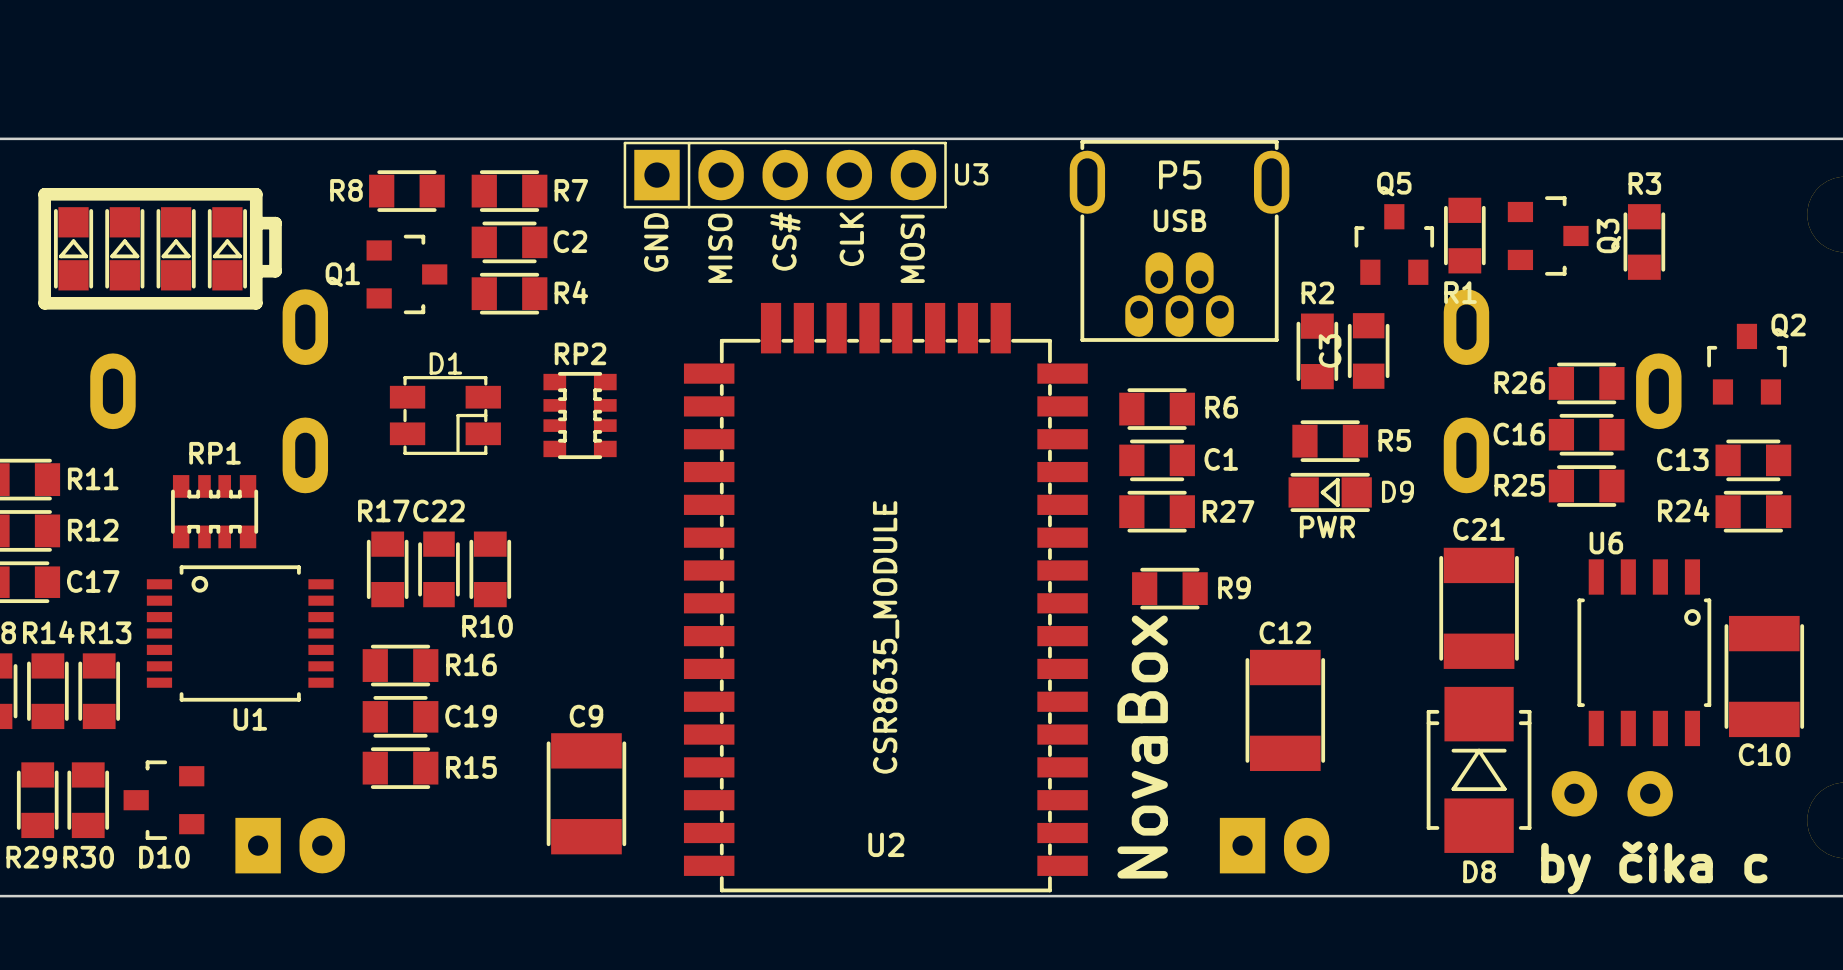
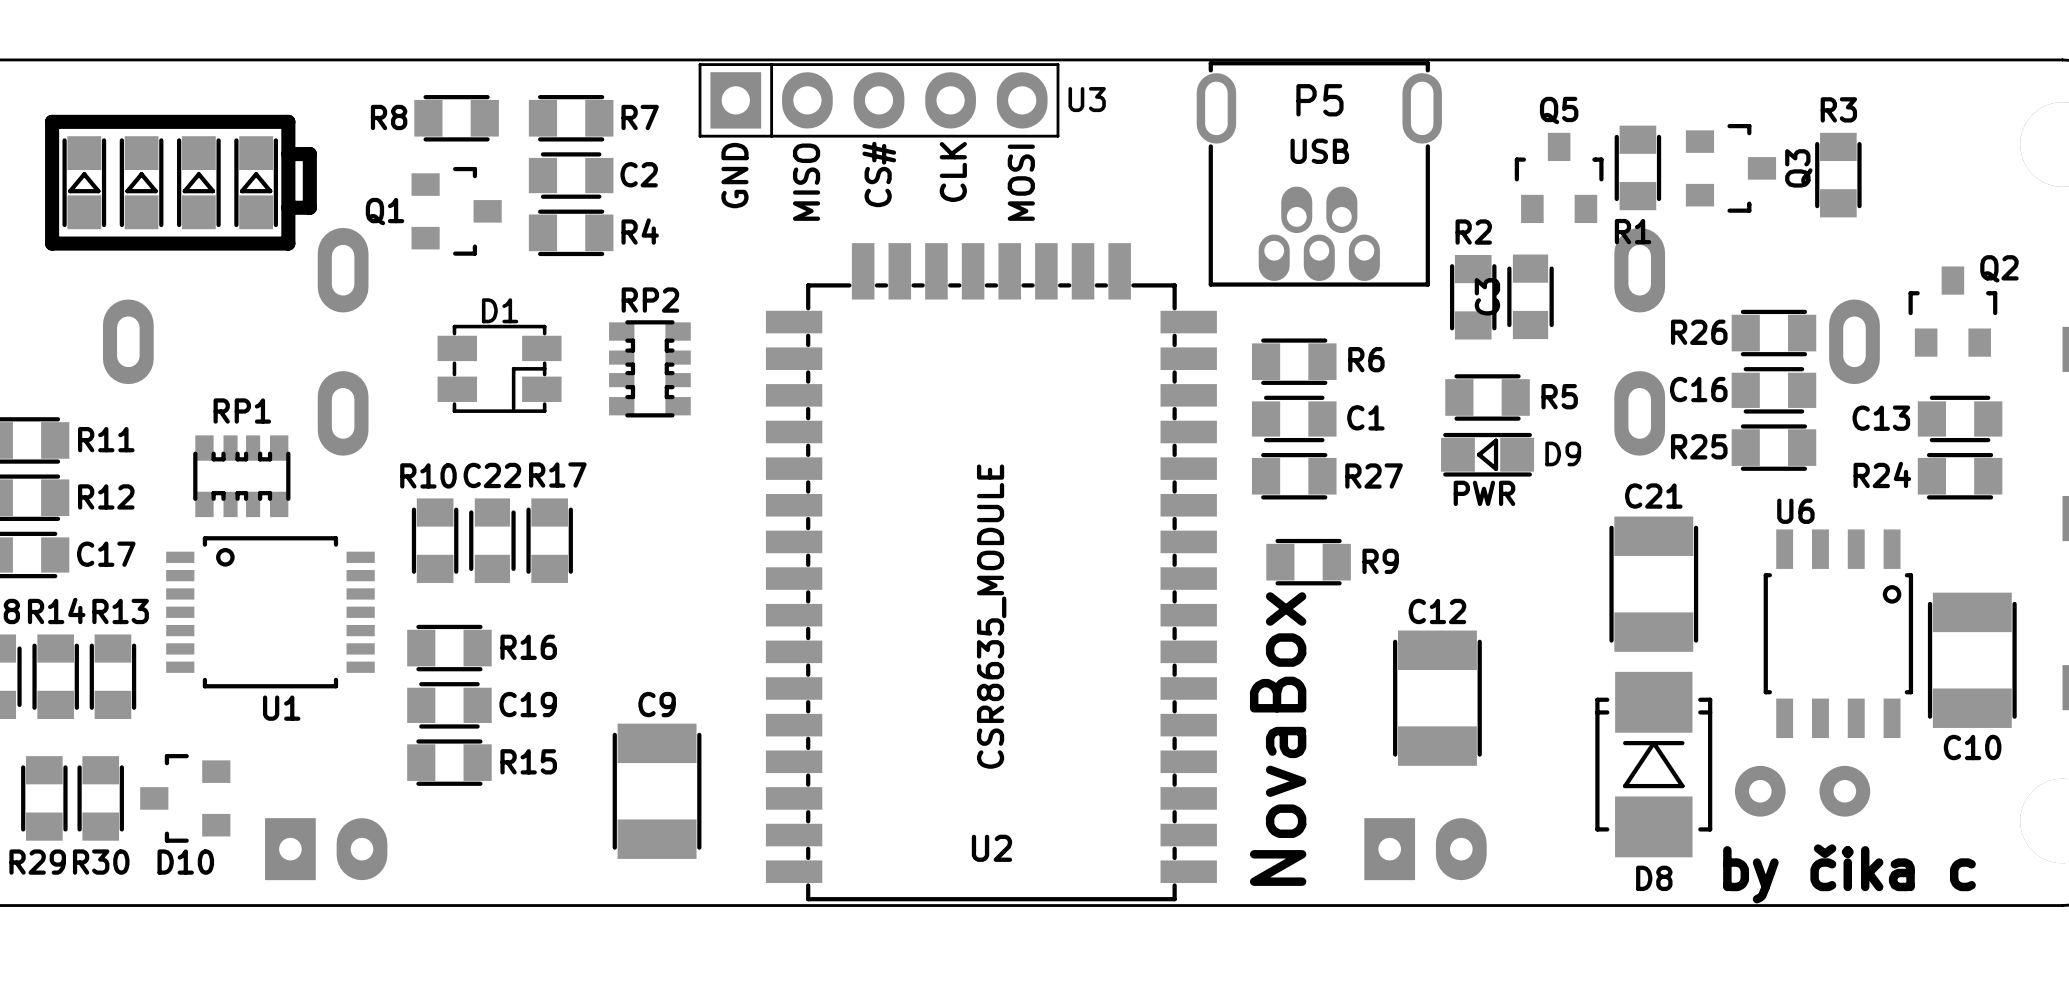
R17 name: R17 (383, 510) -> R10 (428, 475)
R10 name: R10 (487, 626) -> R17 (557, 475)

